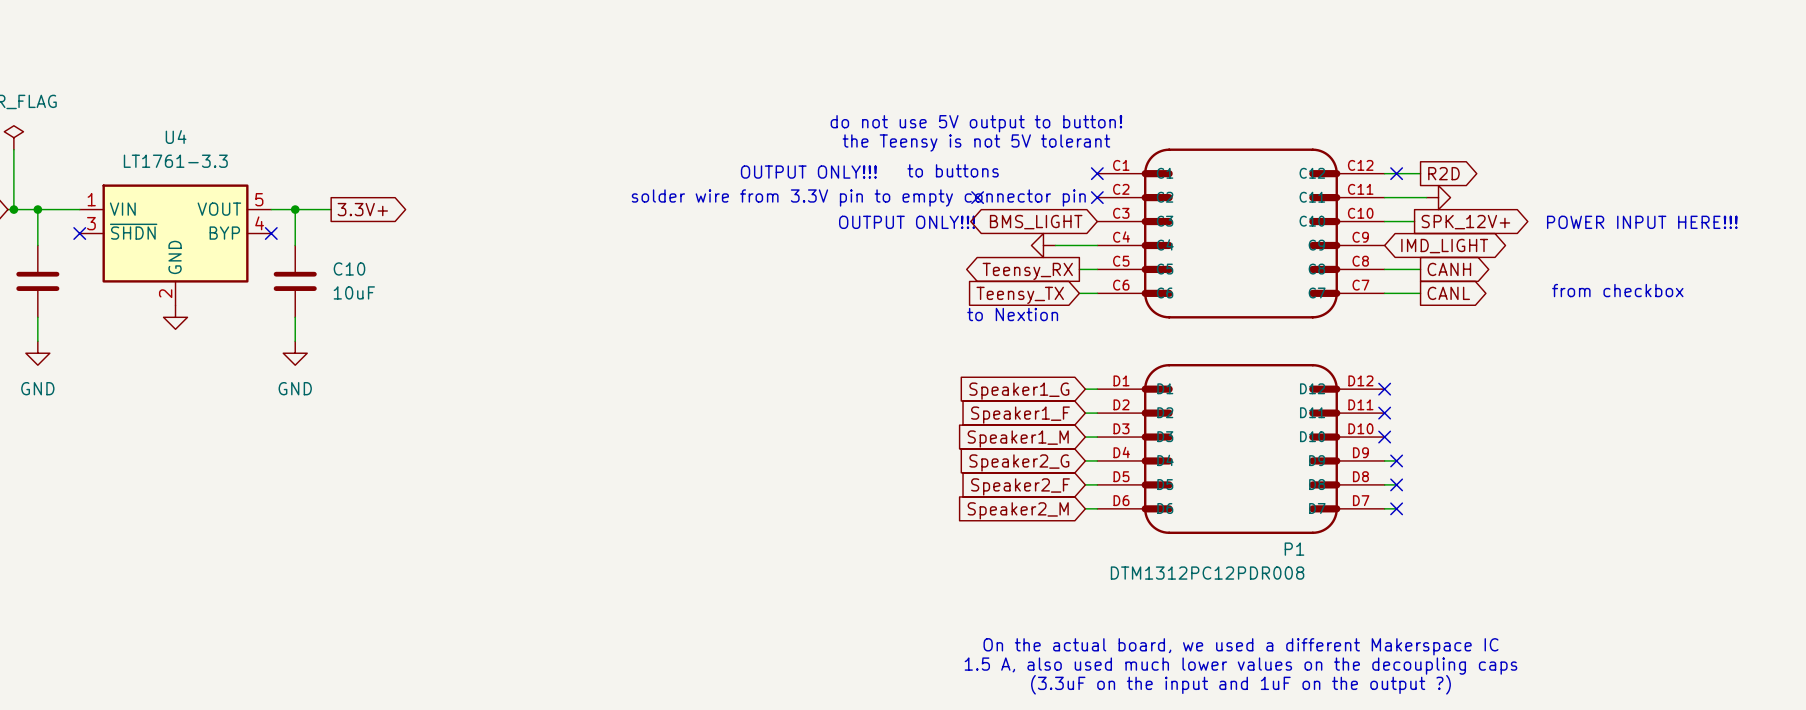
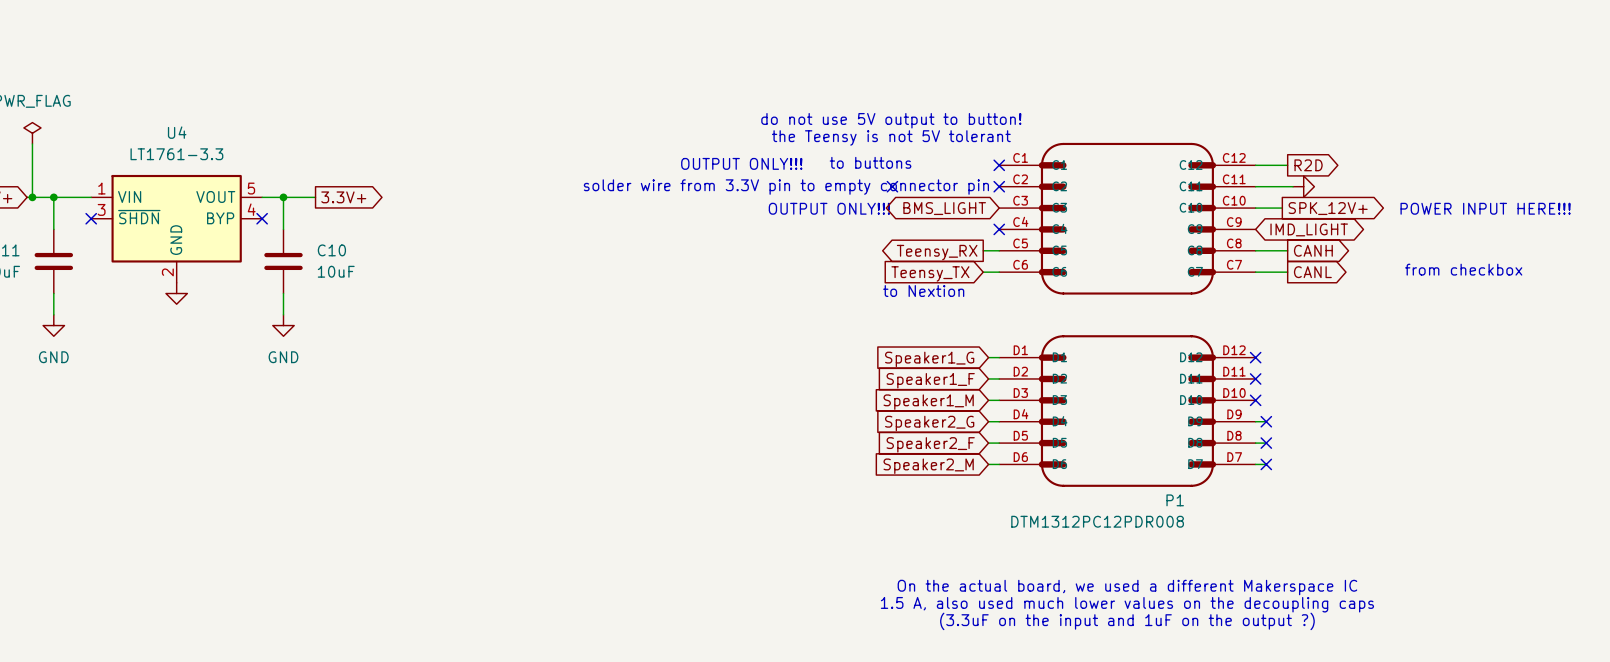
no-connect mark: (1396, 173) -> none
power symbol: (1043, 245) -> none
wire: (1055, 245) (1097, 245) -> none
no-connect mark: none -> (999, 229)

